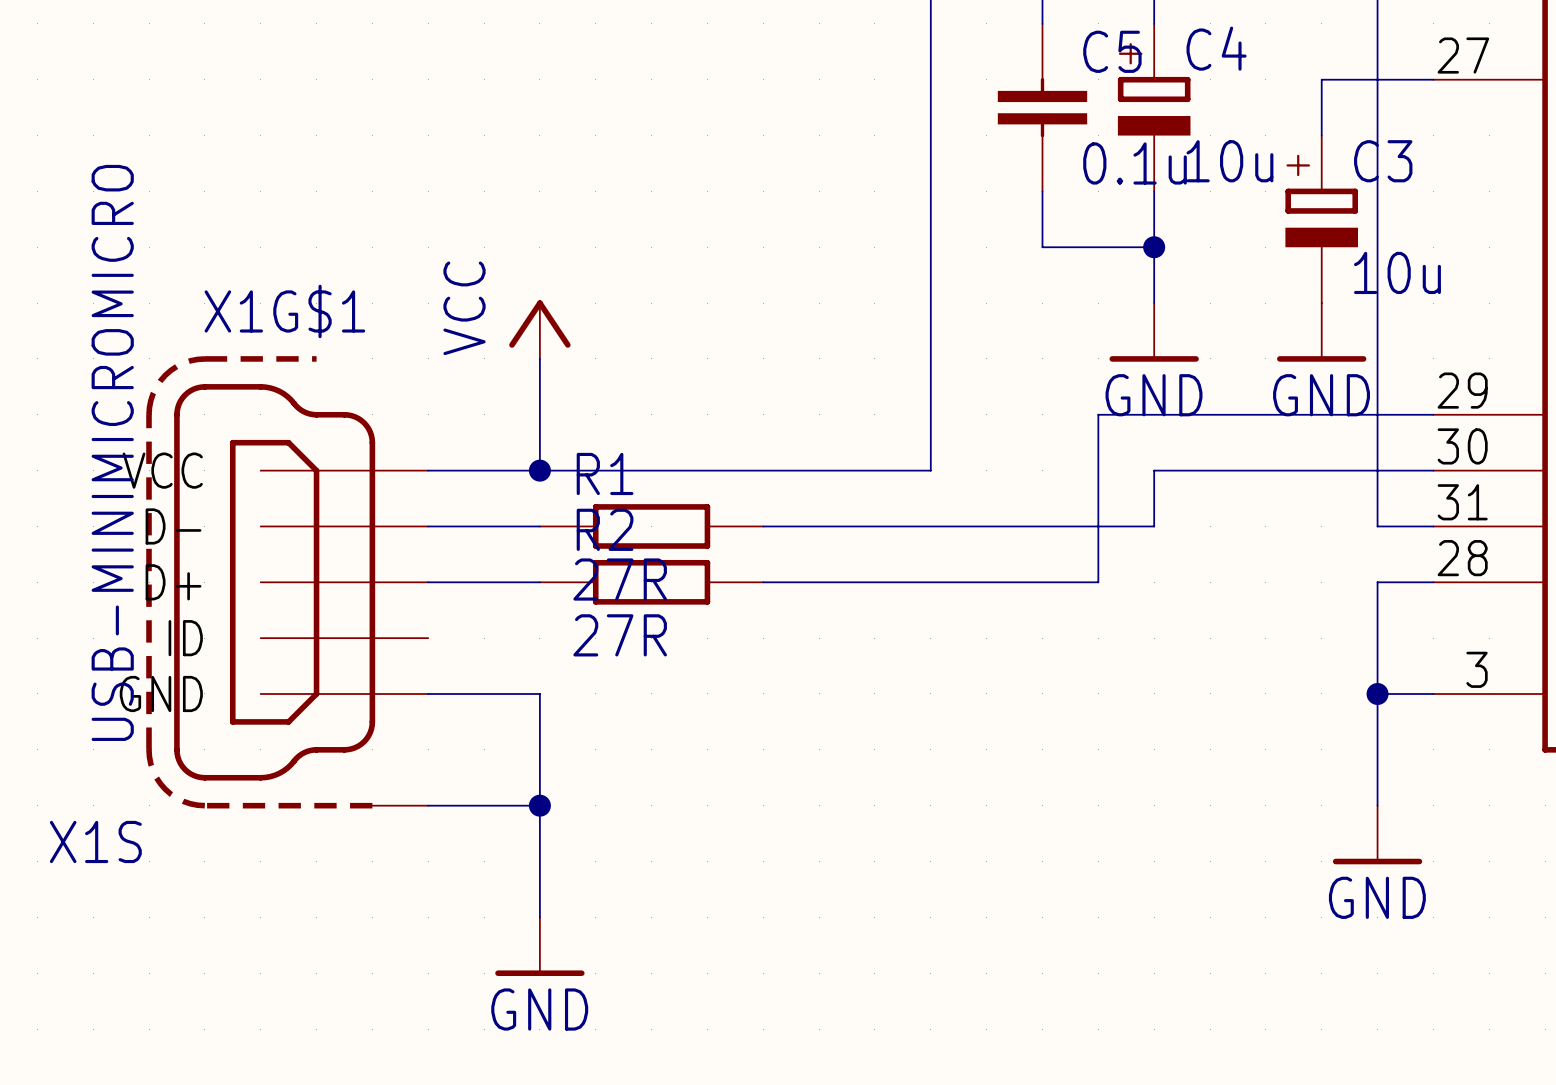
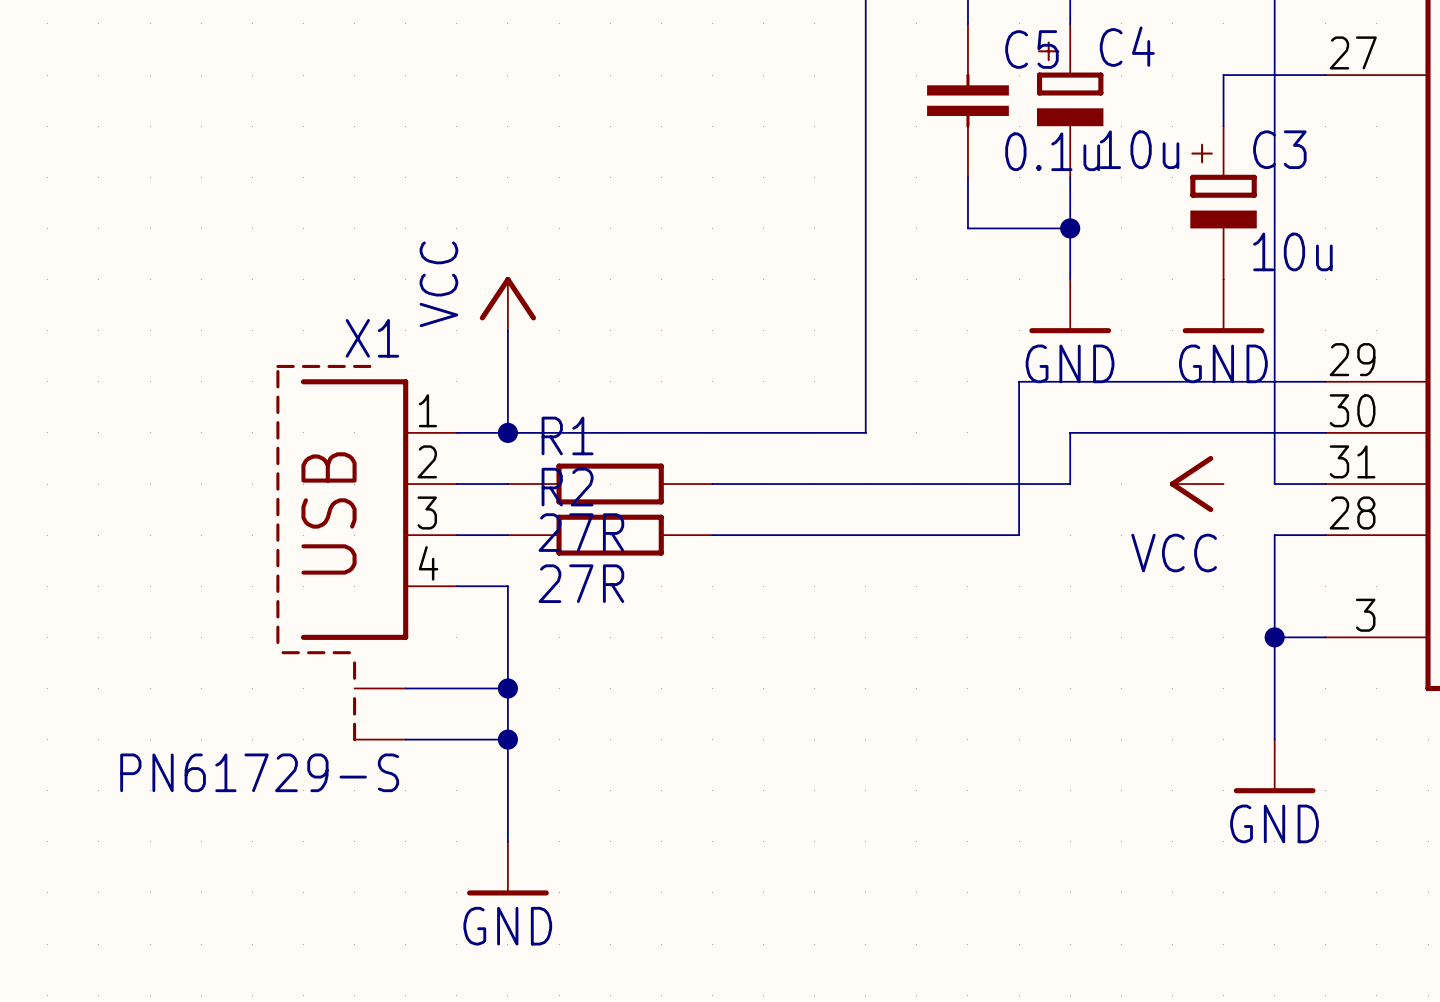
power symbol: none -> VCC (1196, 484)
X1S: (287, 582) -> none
X1G$1: USB-MINIMICROMICRO (301, 582) -> none
X1: none -> PN61729-S (366, 553)
wire: (428, 693) (539, 693) -> (456, 586) (507, 586) (507, 637)
wire: none -> (405, 688) (507, 688)
junction: none -> (507, 688)

